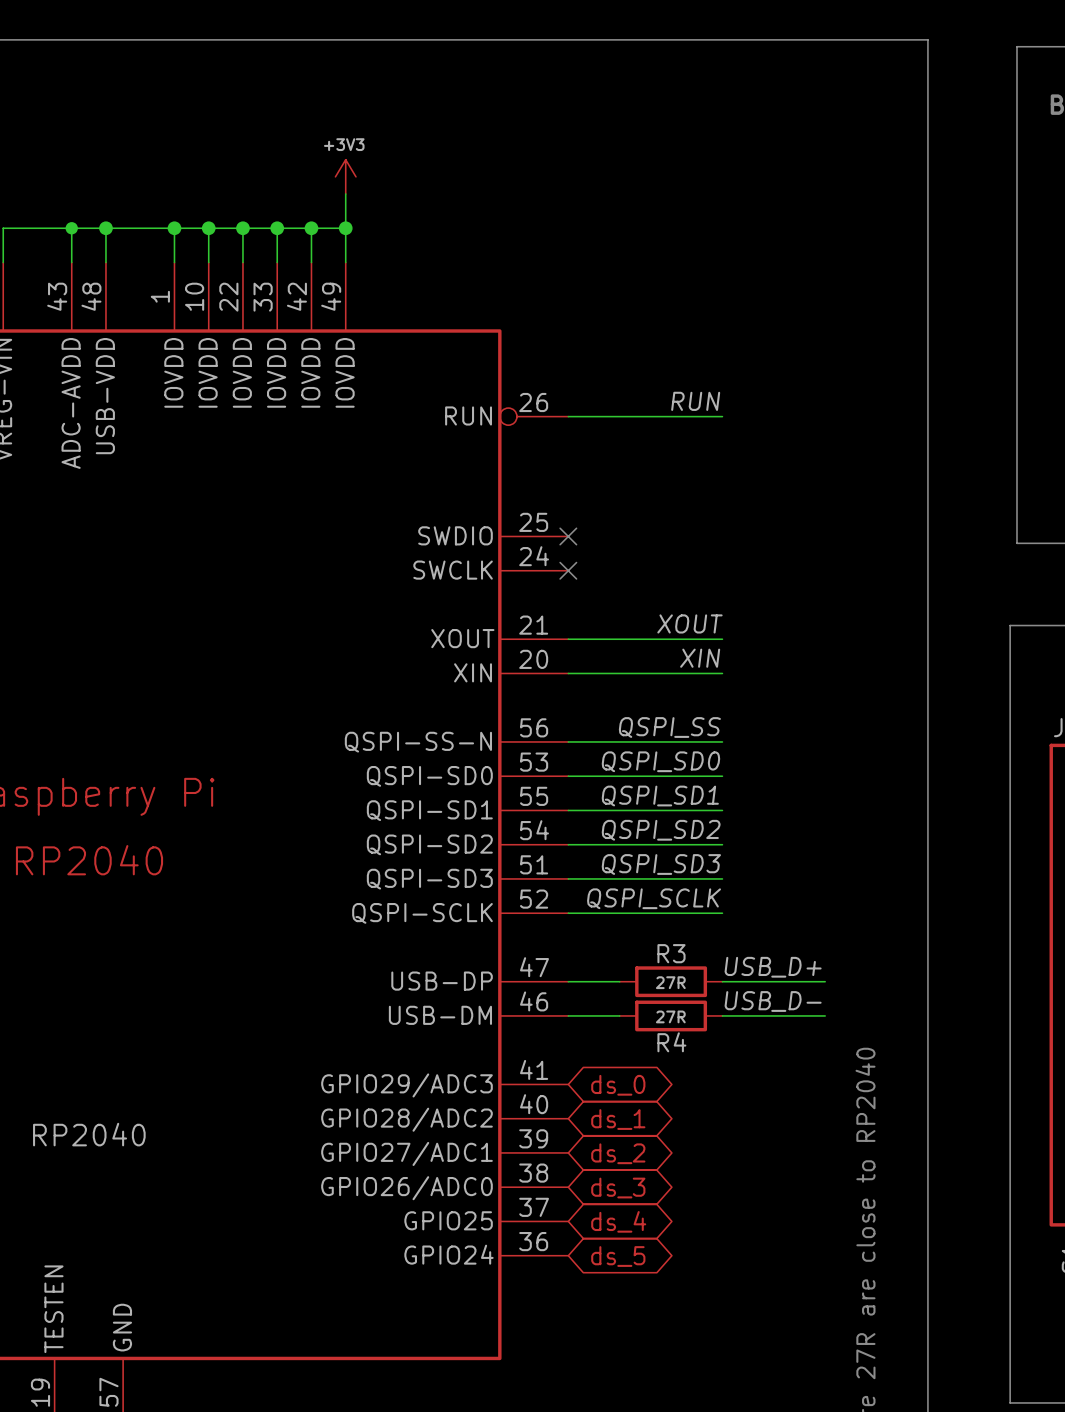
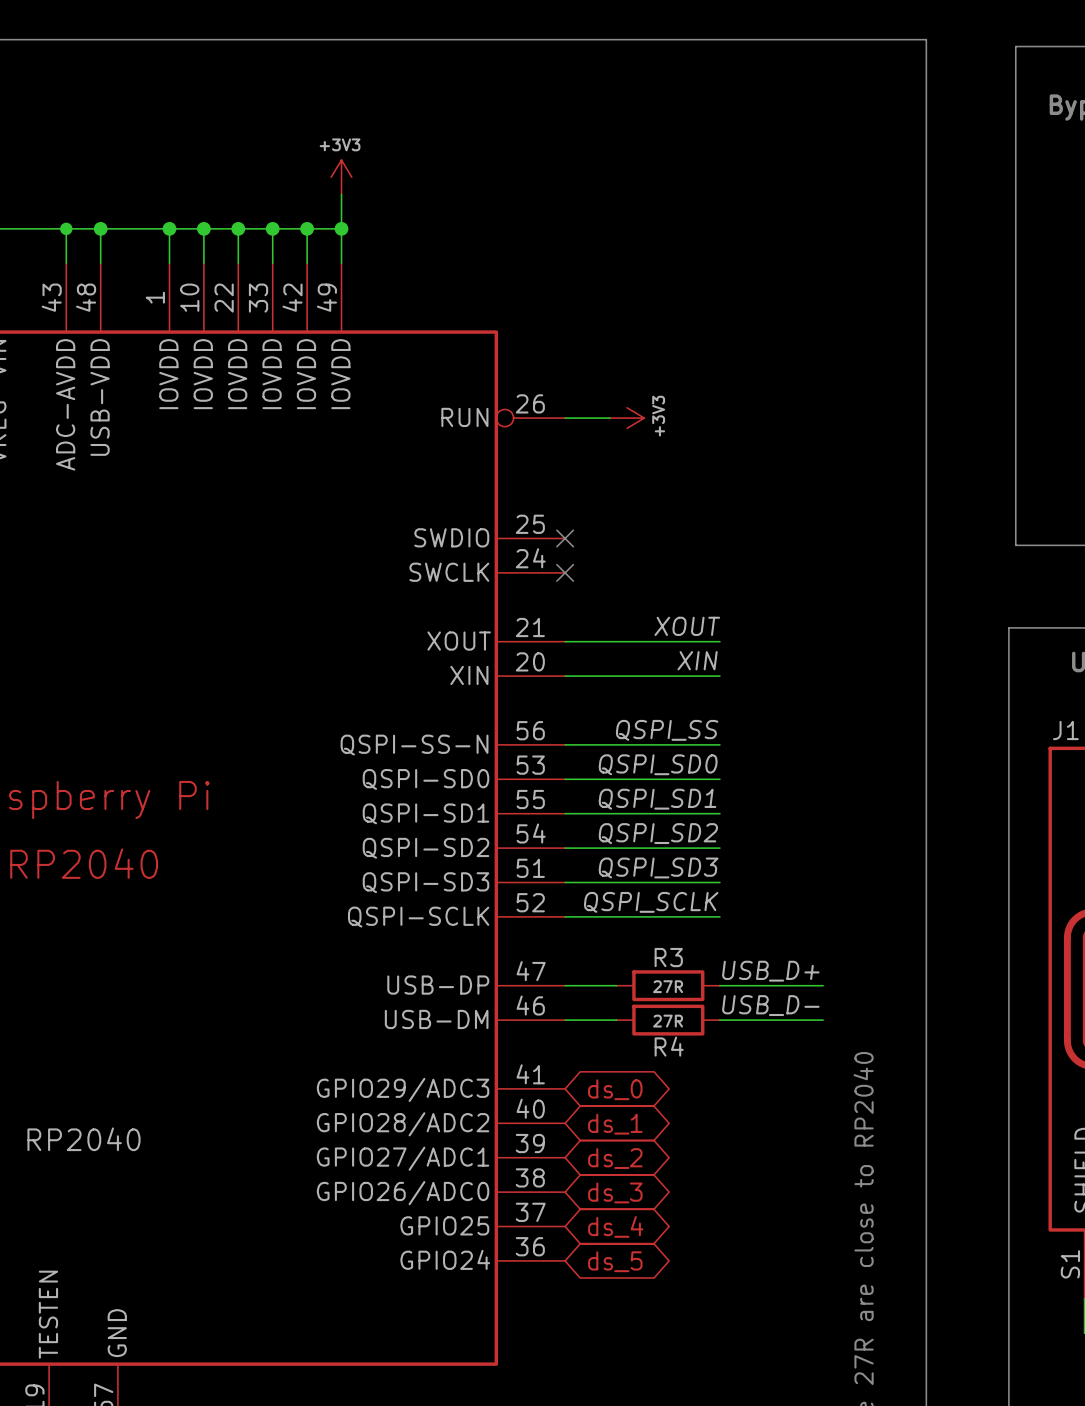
label: RUN (695, 401) -> none
wire: (612, 416) (722, 416) -> none
power symbol: none -> +3V3 (627, 418)

